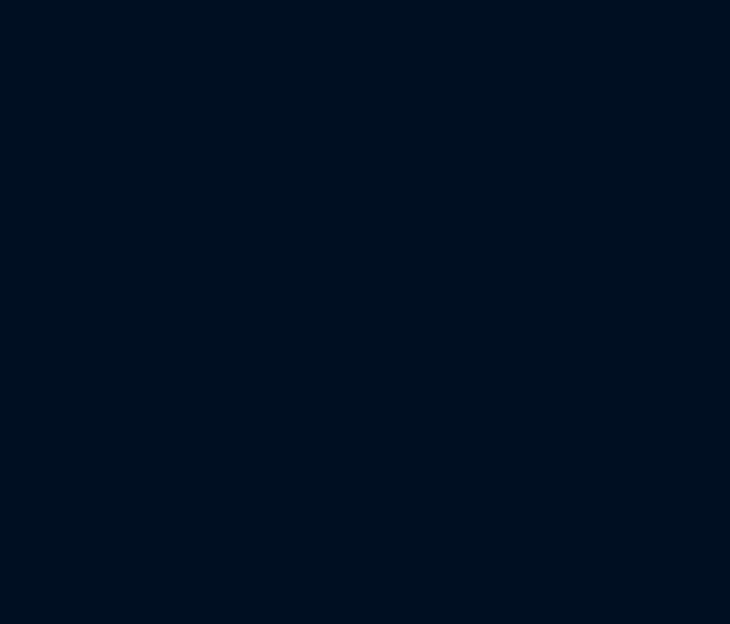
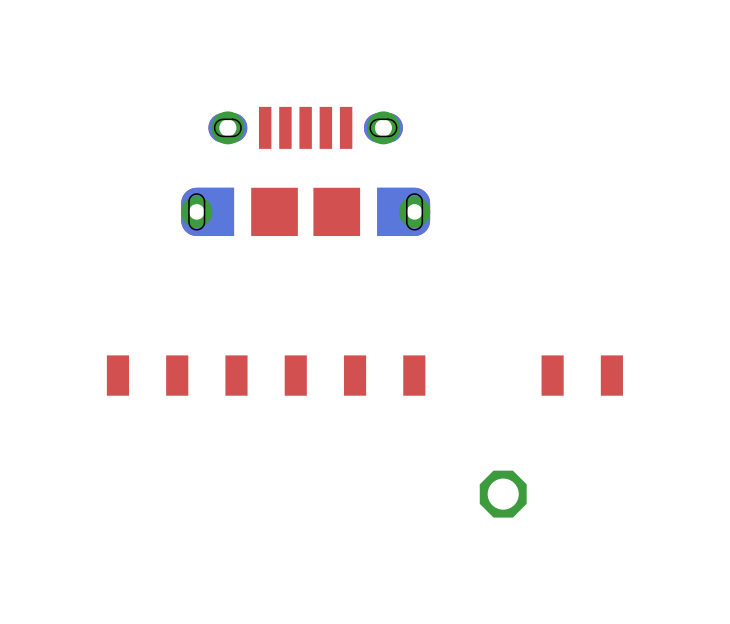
part: none -> (305, 171)
part: none -> (147, 375)
part: none -> (266, 375)
part: none -> (384, 375)
part: none -> (582, 375)
part: none -> (503, 494)

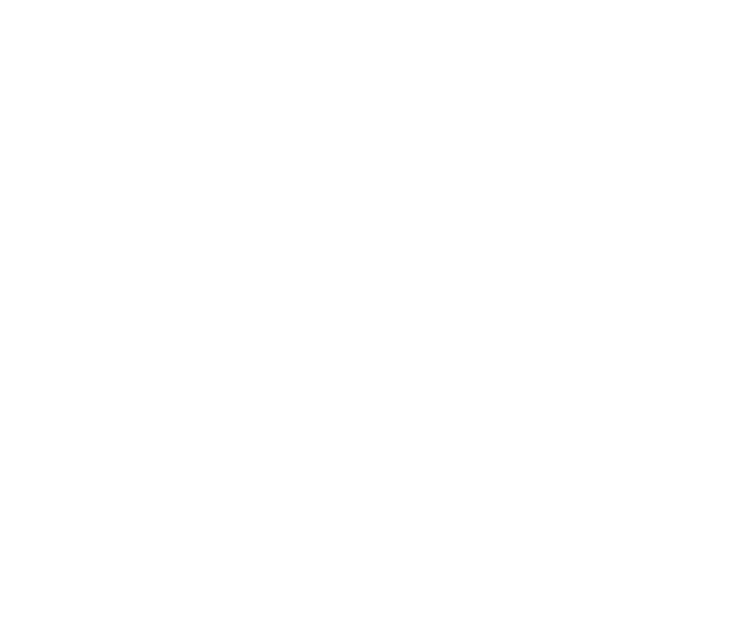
part: (305, 171) -> none
part: (147, 375) -> none
part: (266, 375) -> none
part: (384, 375) -> none
part: (582, 375) -> none
part: (503, 494) -> none

